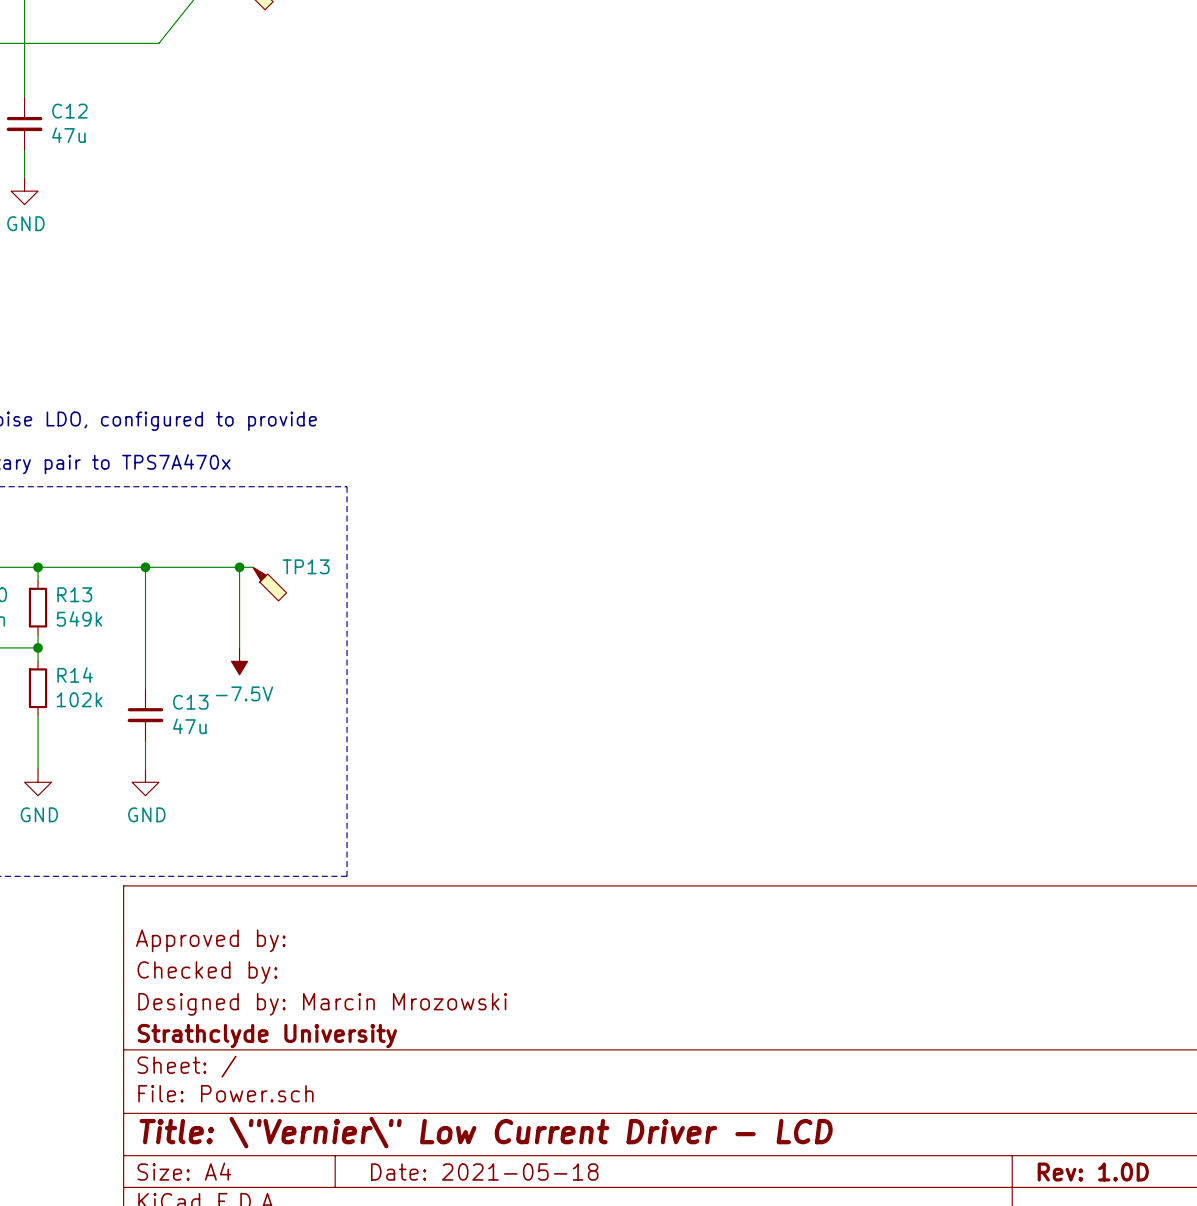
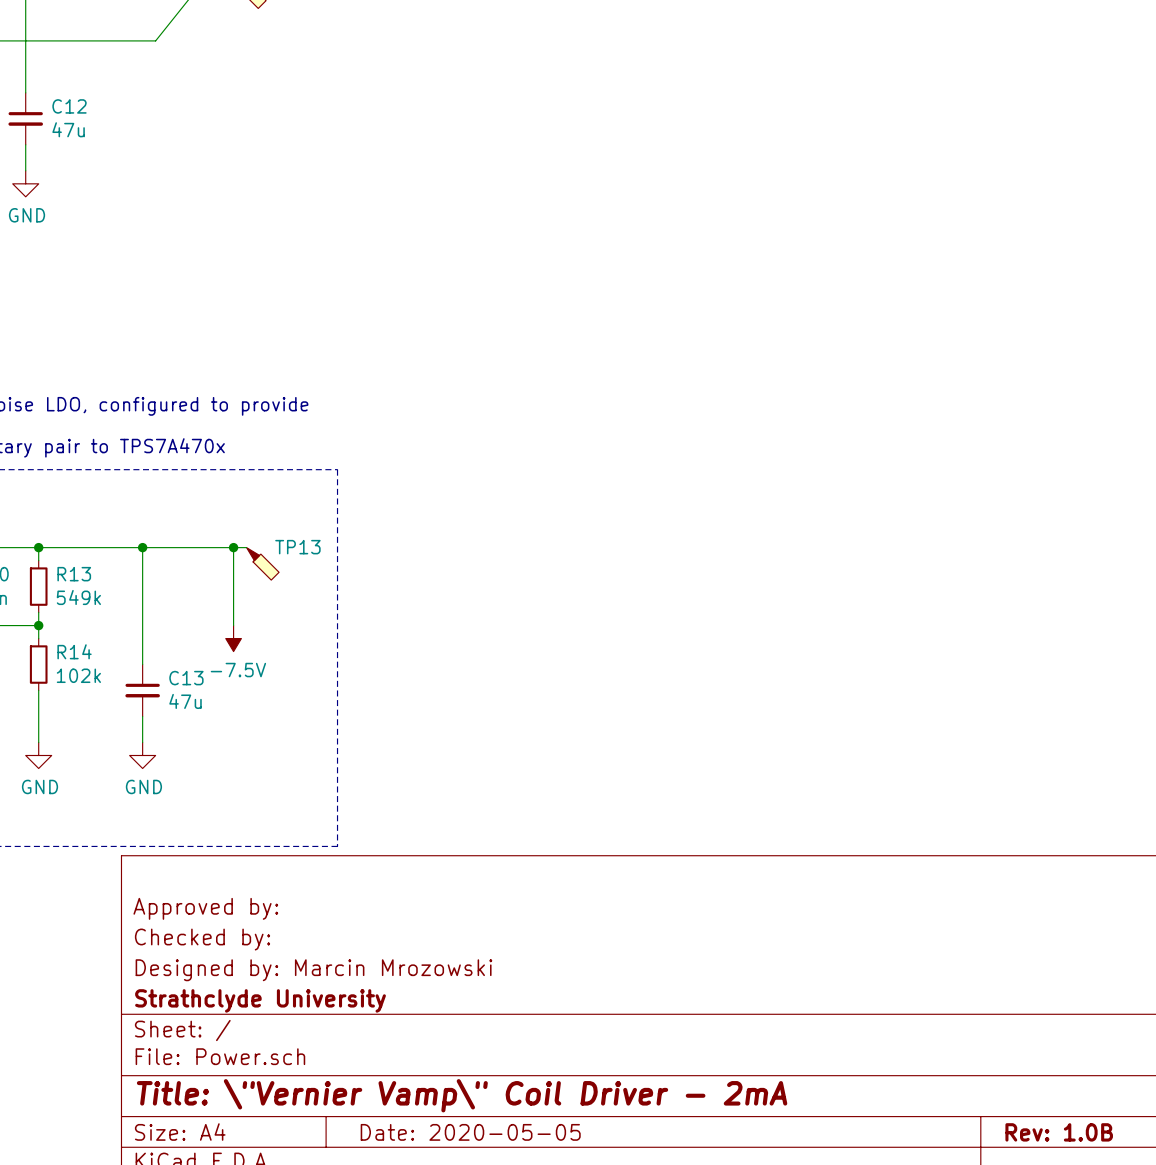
title block: Title: \"Vernier\" Low Current Driver - LCD (486, 1132) -> Title: \"Vernier Vamp\" Coil Driver - 2mA (462, 1095)
title block: Date: 2021-05-18 (484, 1172) -> Date: 2020-05-05 (470, 1132)
title block: Rev: 1.0D (1093, 1172) -> Rev: 1.0B (1059, 1132)

